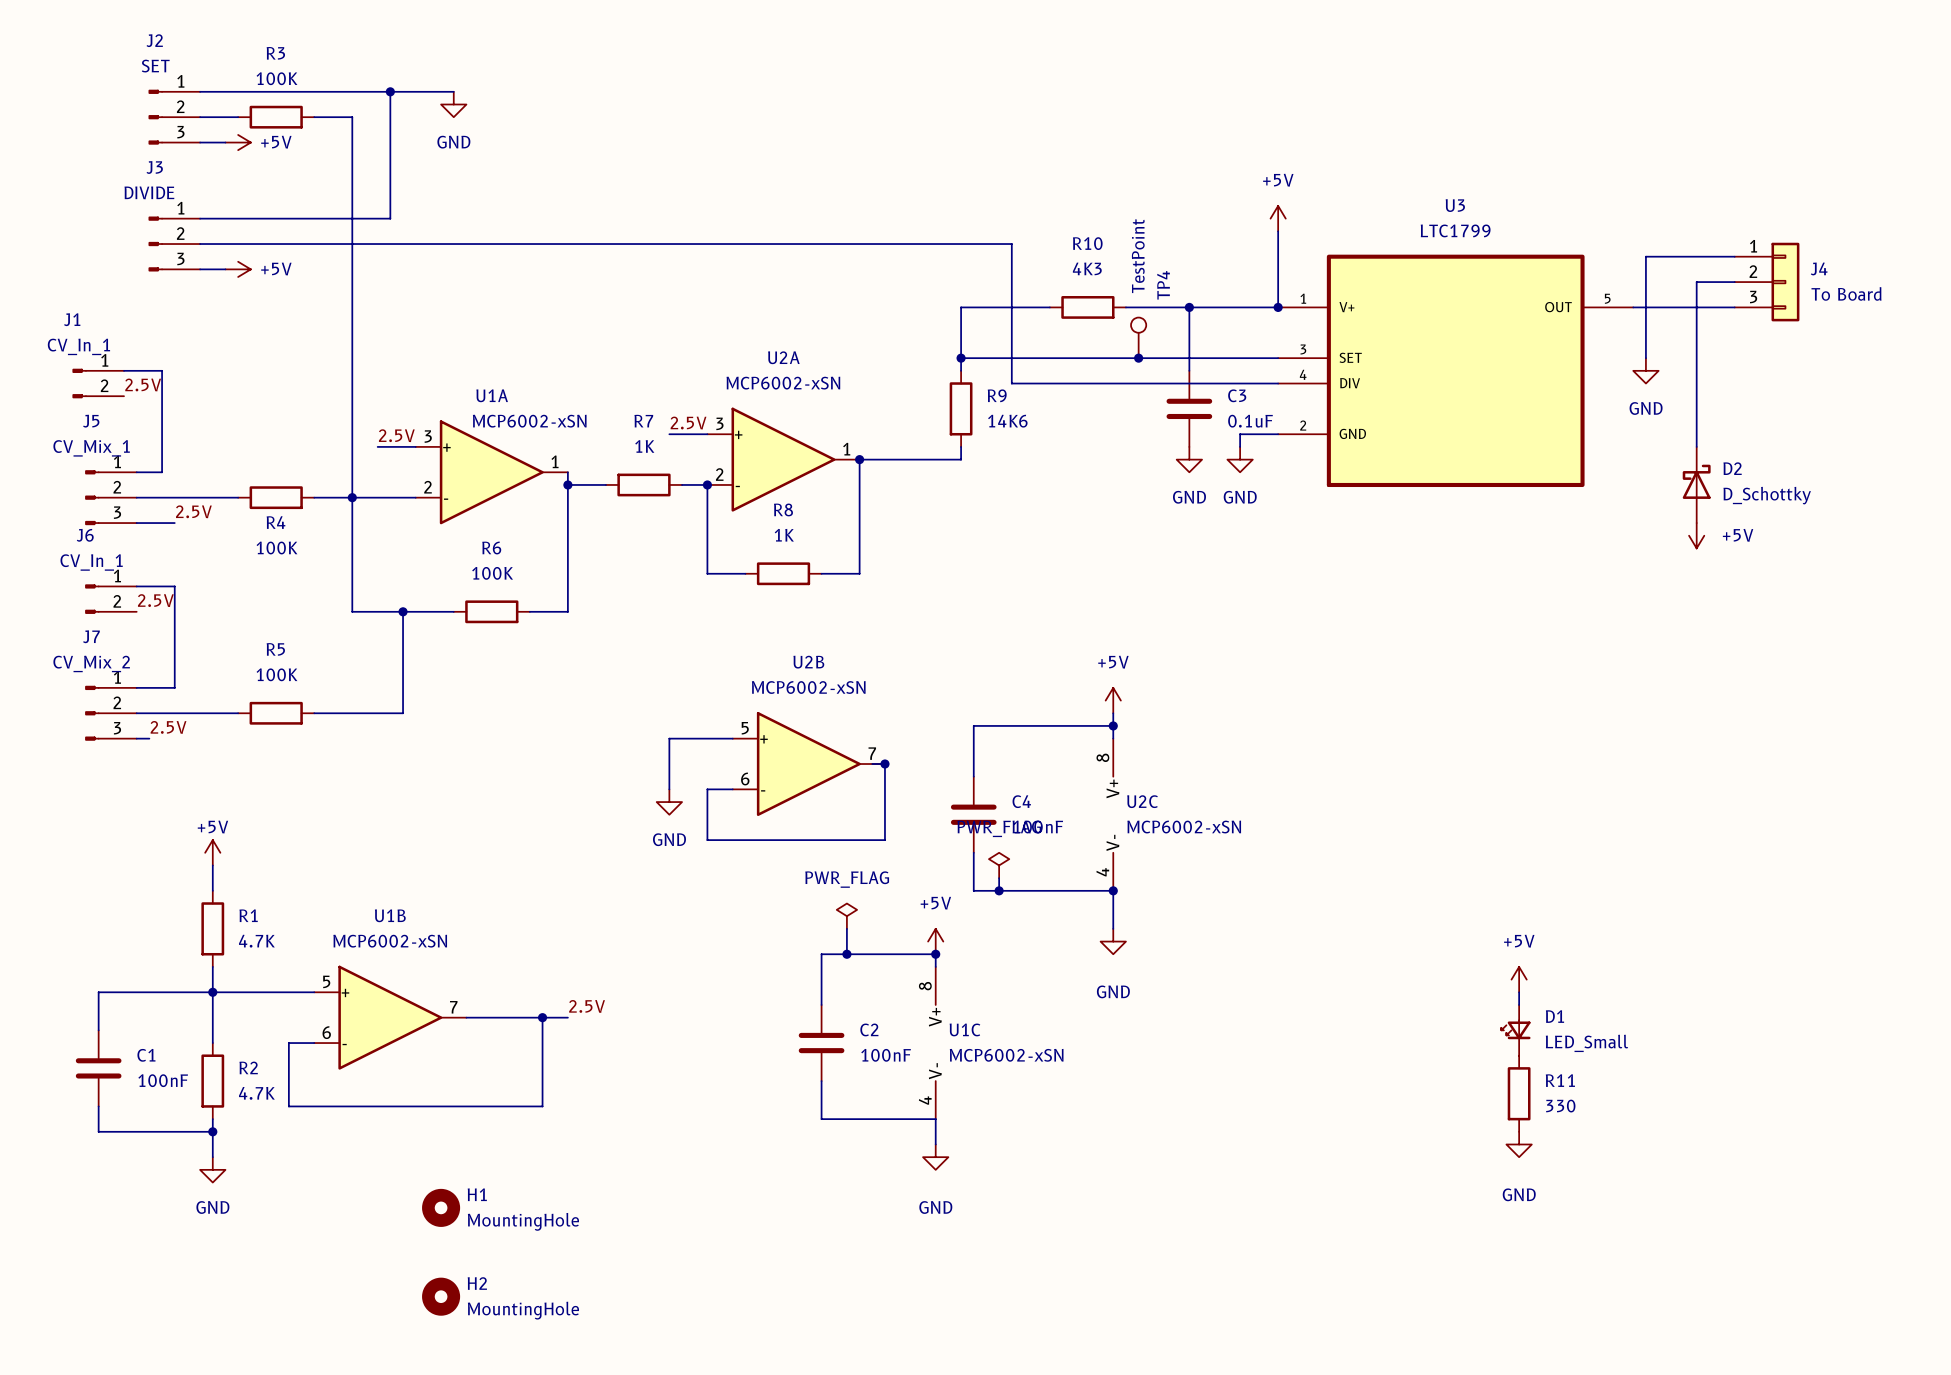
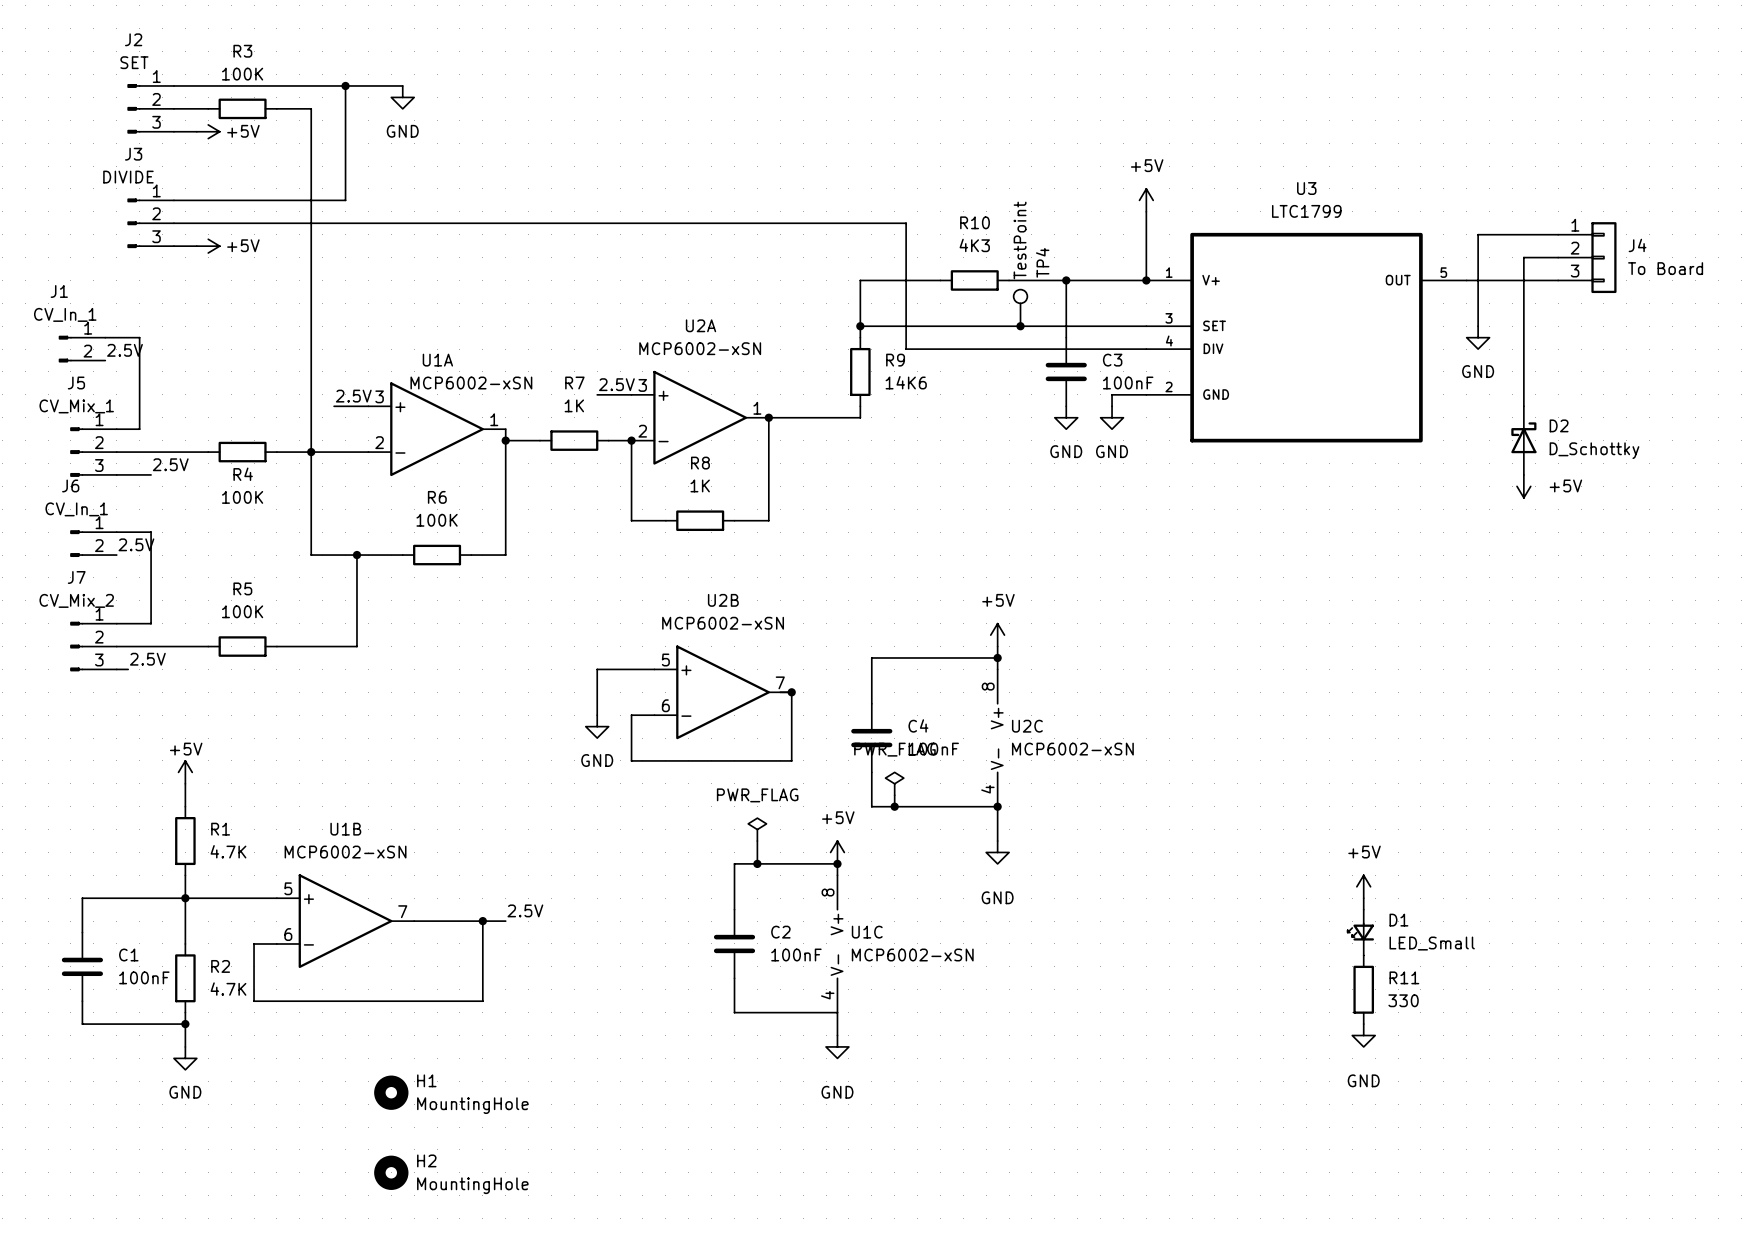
C3 value: 0.1uF (1250, 421) -> 100nF (1128, 383)

